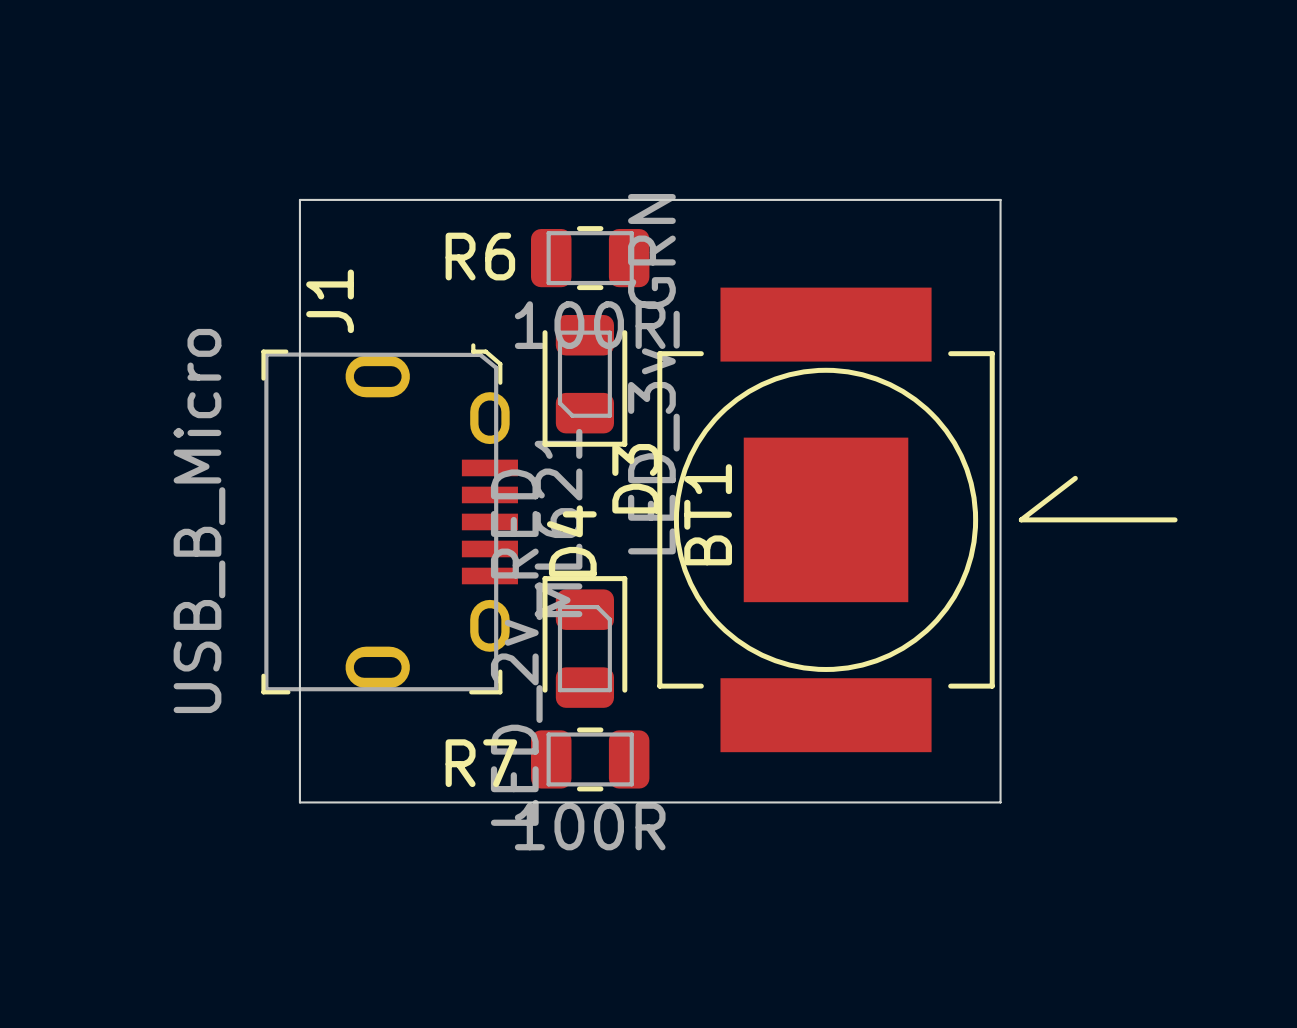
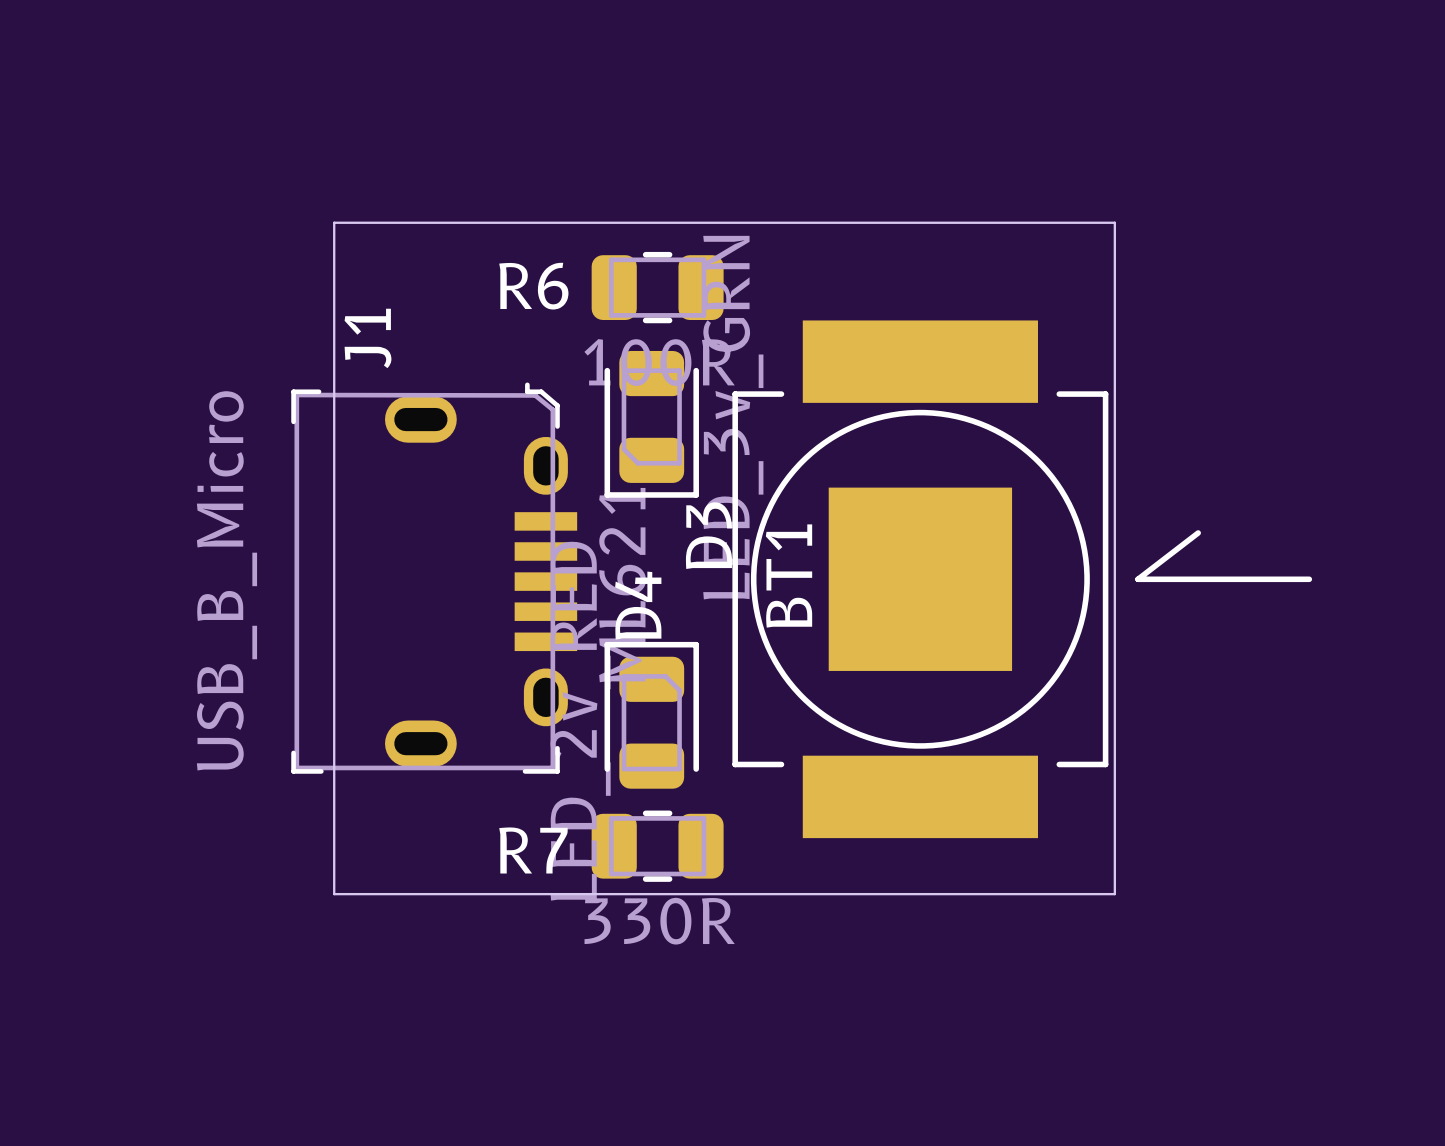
R7 value: 100R (590, 826) -> 330R (659, 921)

